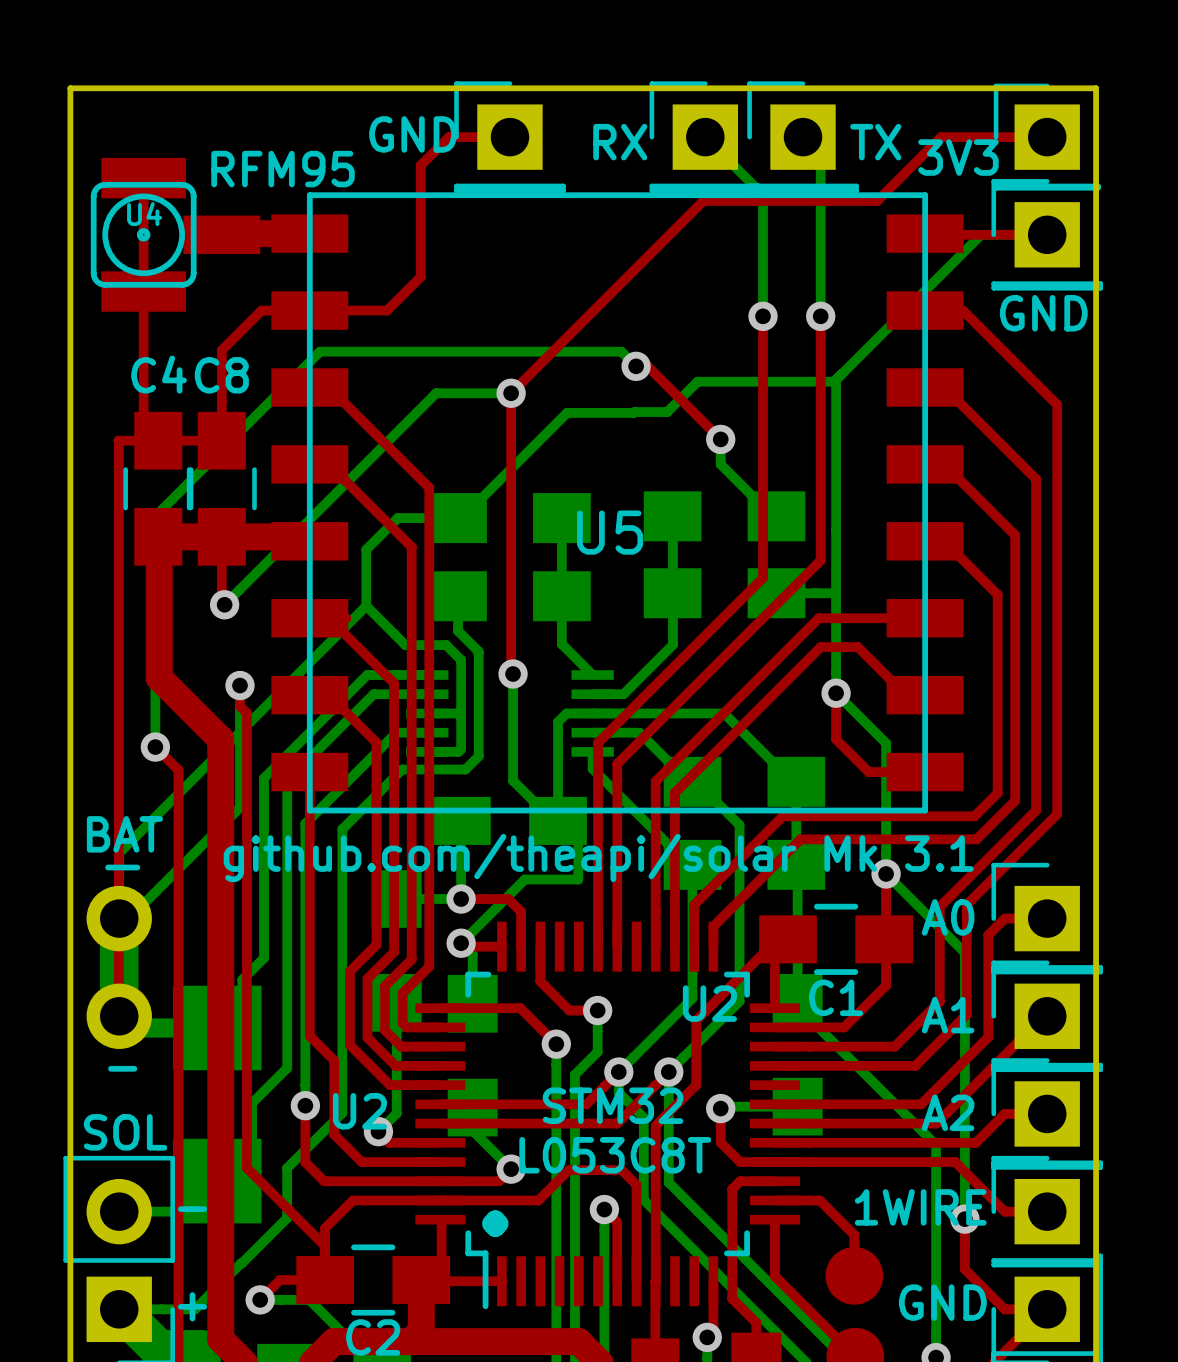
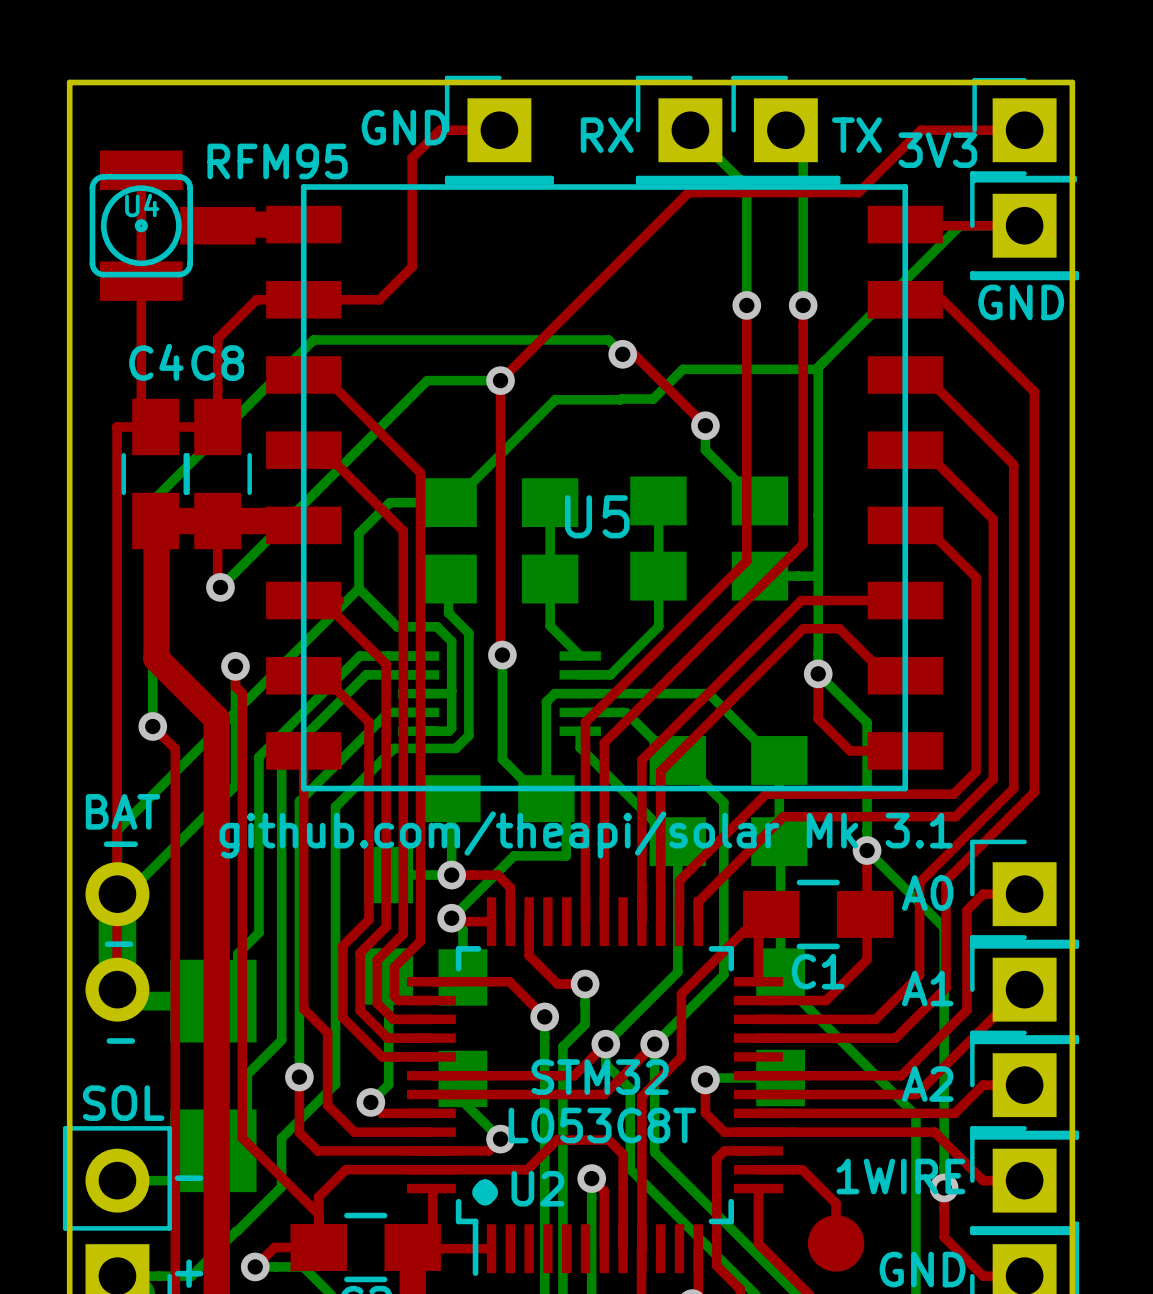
text: none -> - (118, 944)
text: U2 (709, 1003) -> none
U2 name position: U2 (359, 1111) -> U2 (537, 1188)

